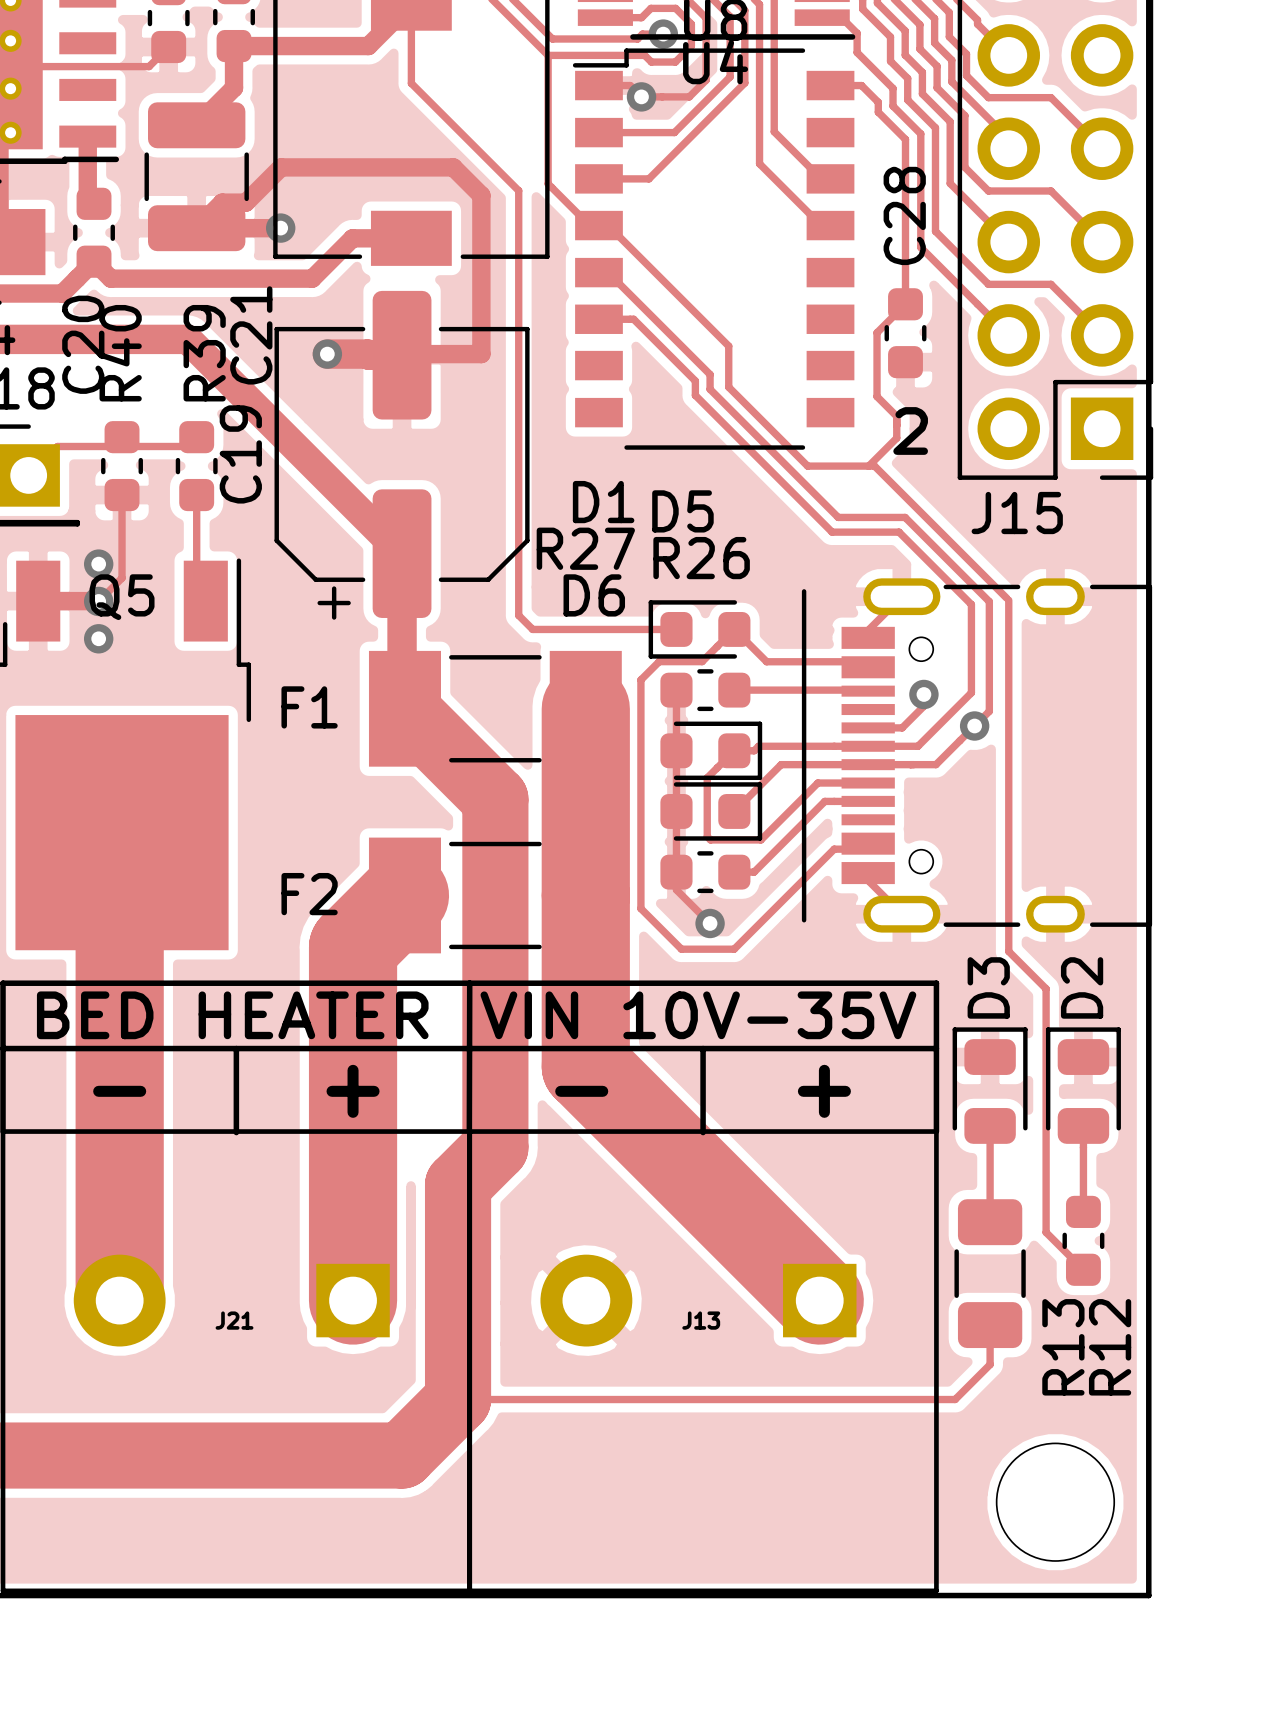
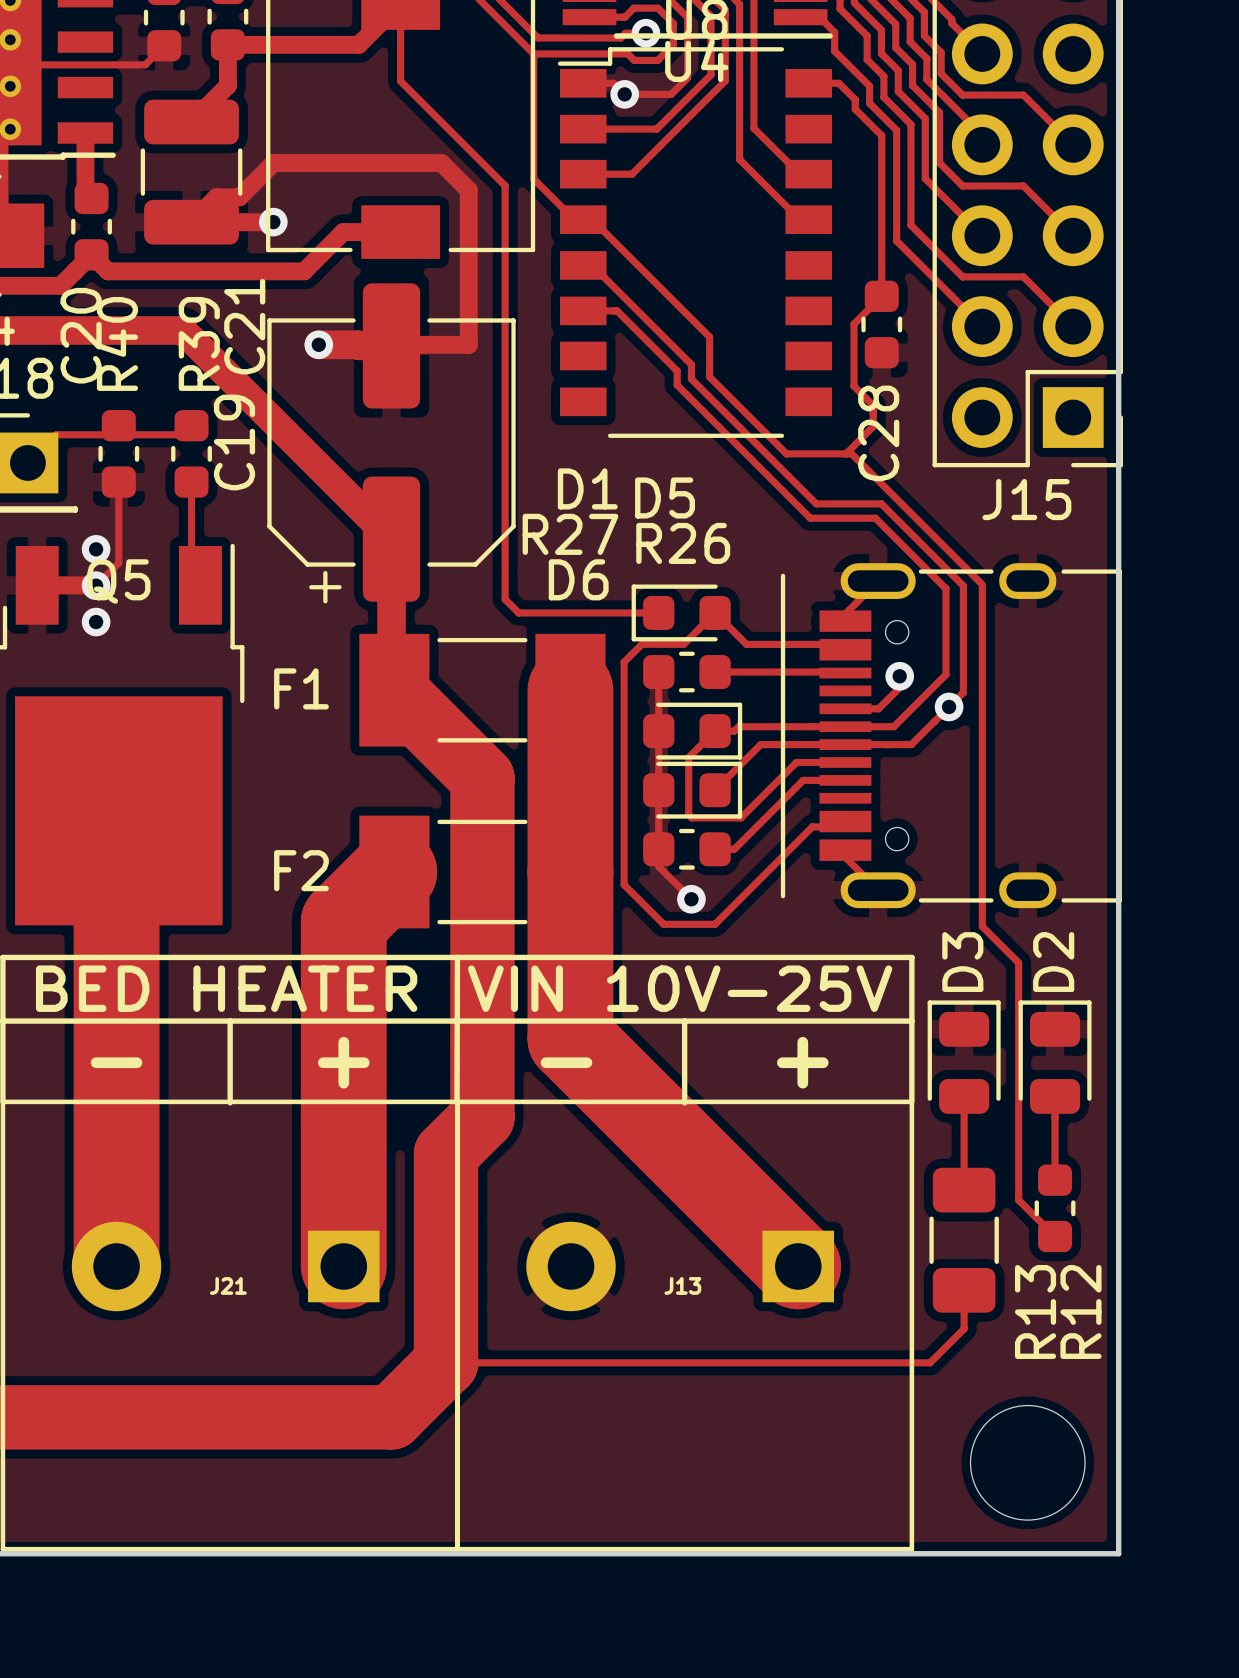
C28 name position: C28 (904, 215) -> C28 (878, 433)
text: 2 (910, 430) -> none
J15 name position: J15 (1017, 513) -> J15 (1026, 499)
text: VIN 10V-35V (698, 1015) -> VIN 10V-25V (680, 988)

